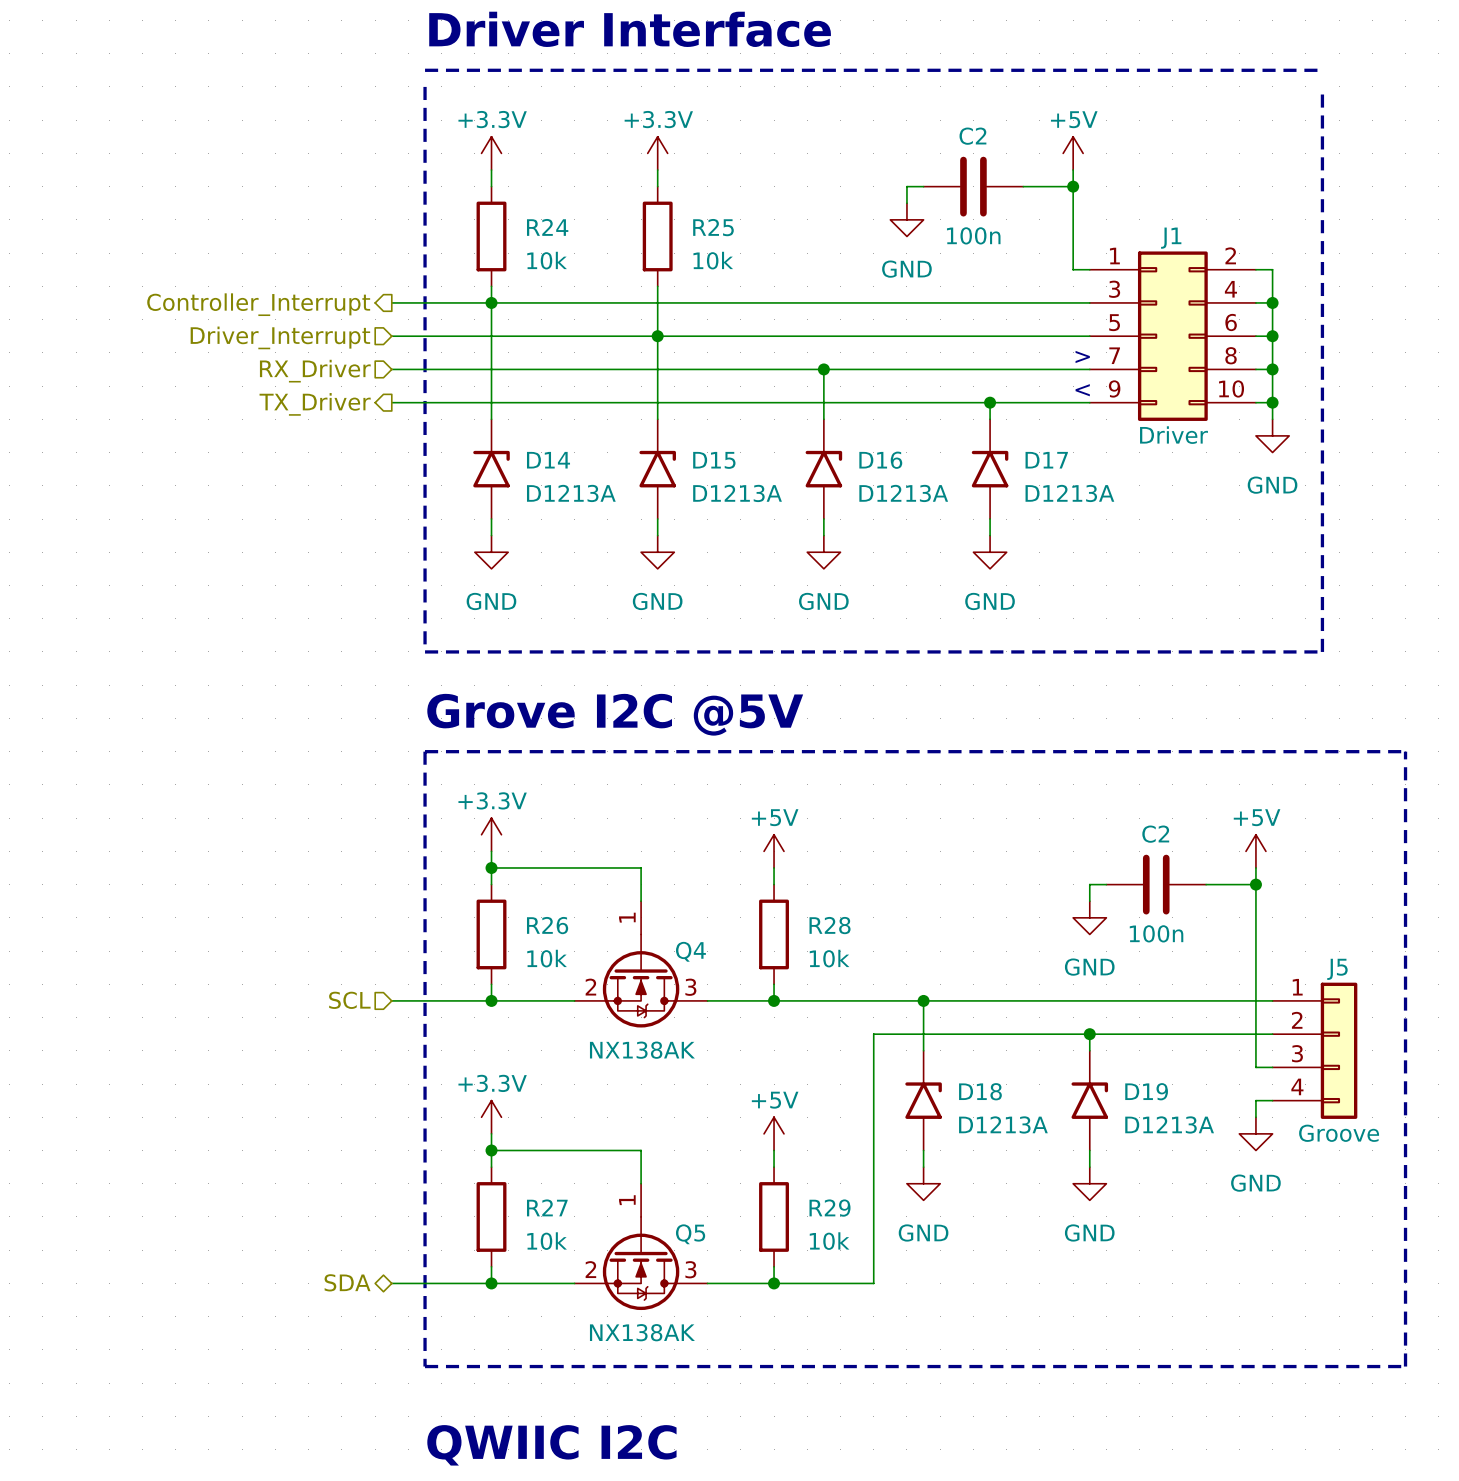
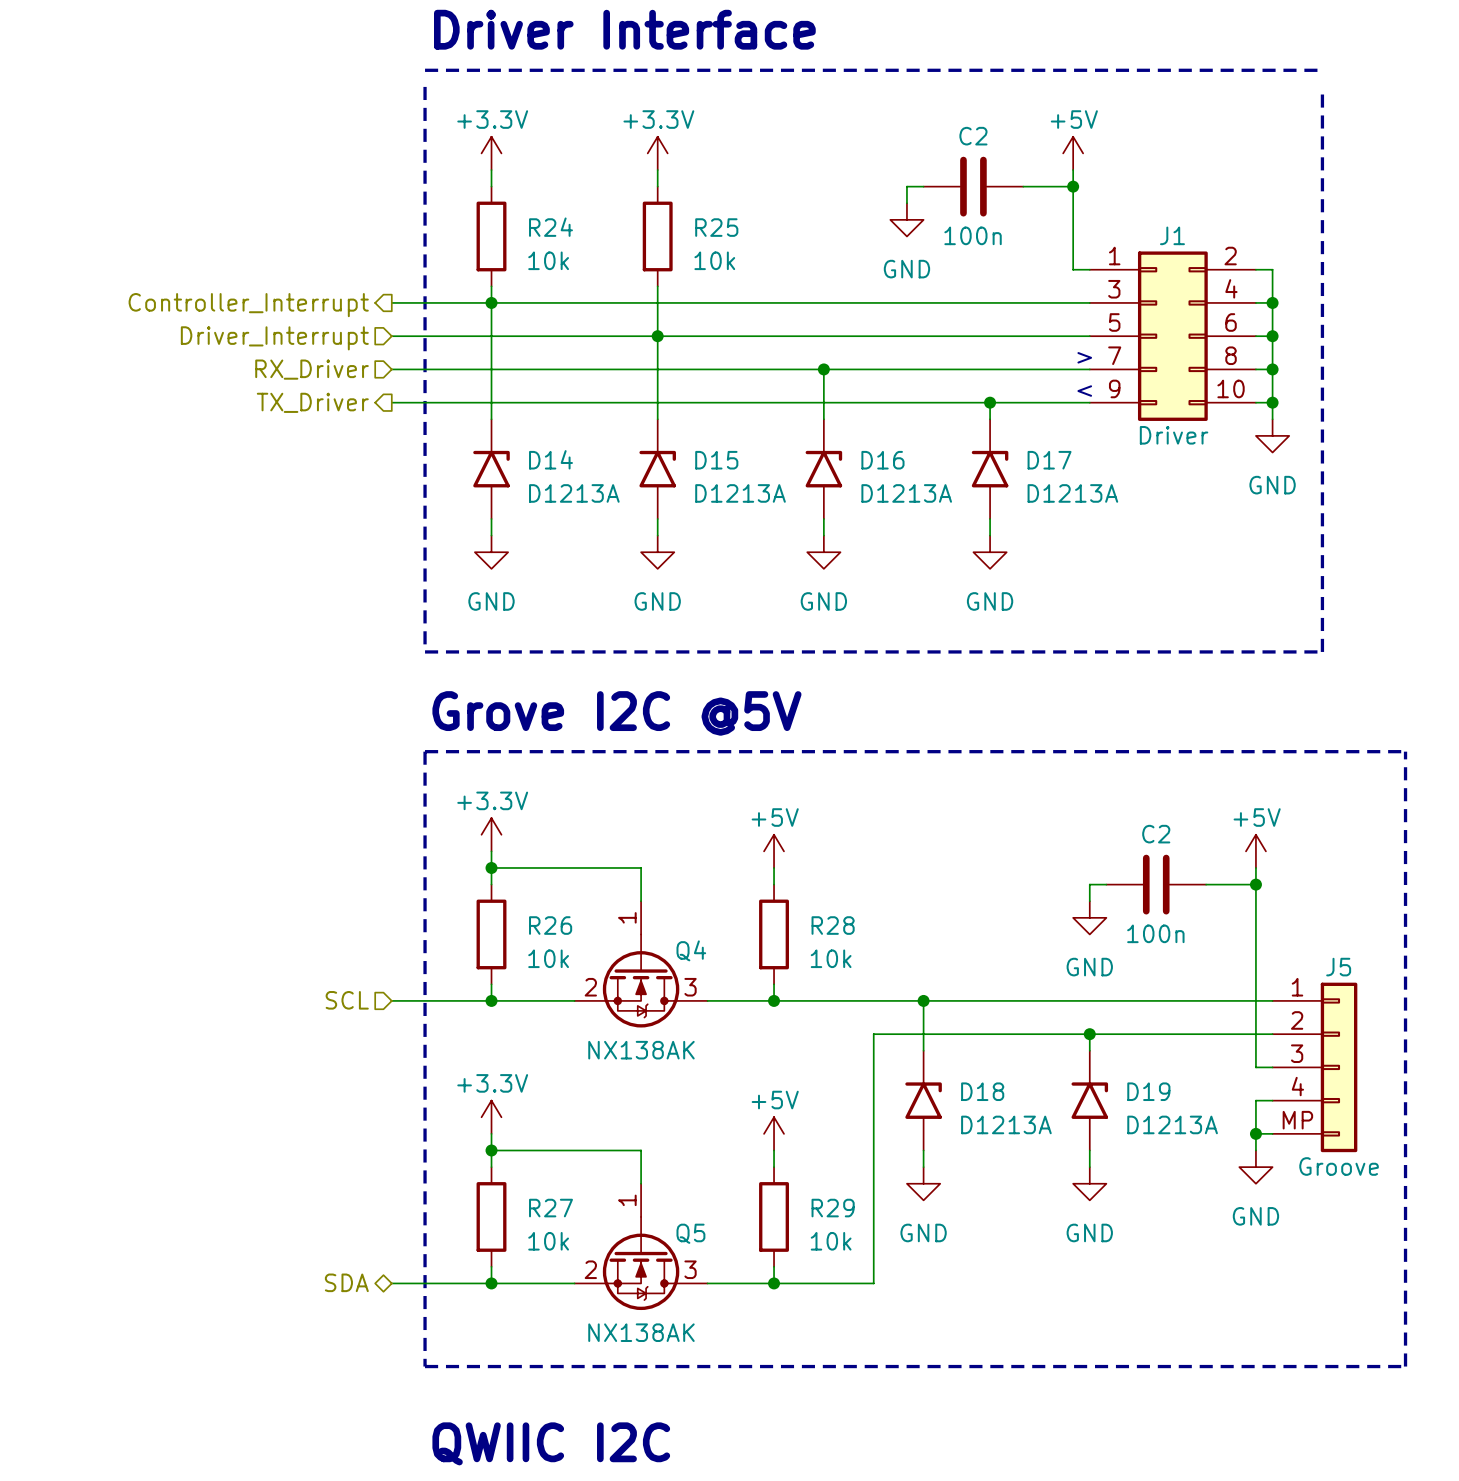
J5 symbol: [1272, 982, 1358, 1119] -> [1272, 982, 1358, 1153]
power symbol position: GND (1255, 1133) -> GND (1255, 1167)
junction: none -> (1255, 1133)

